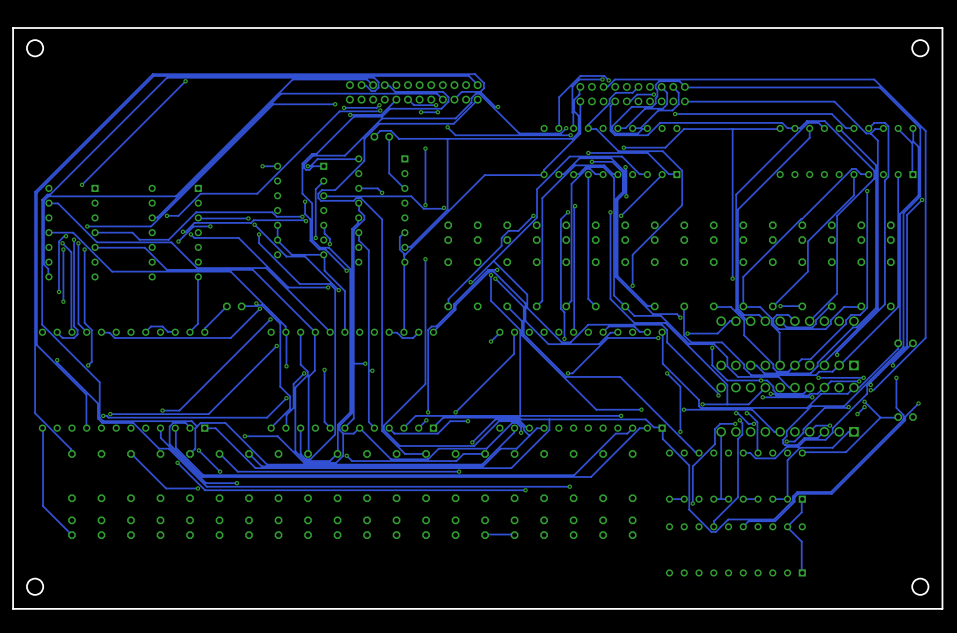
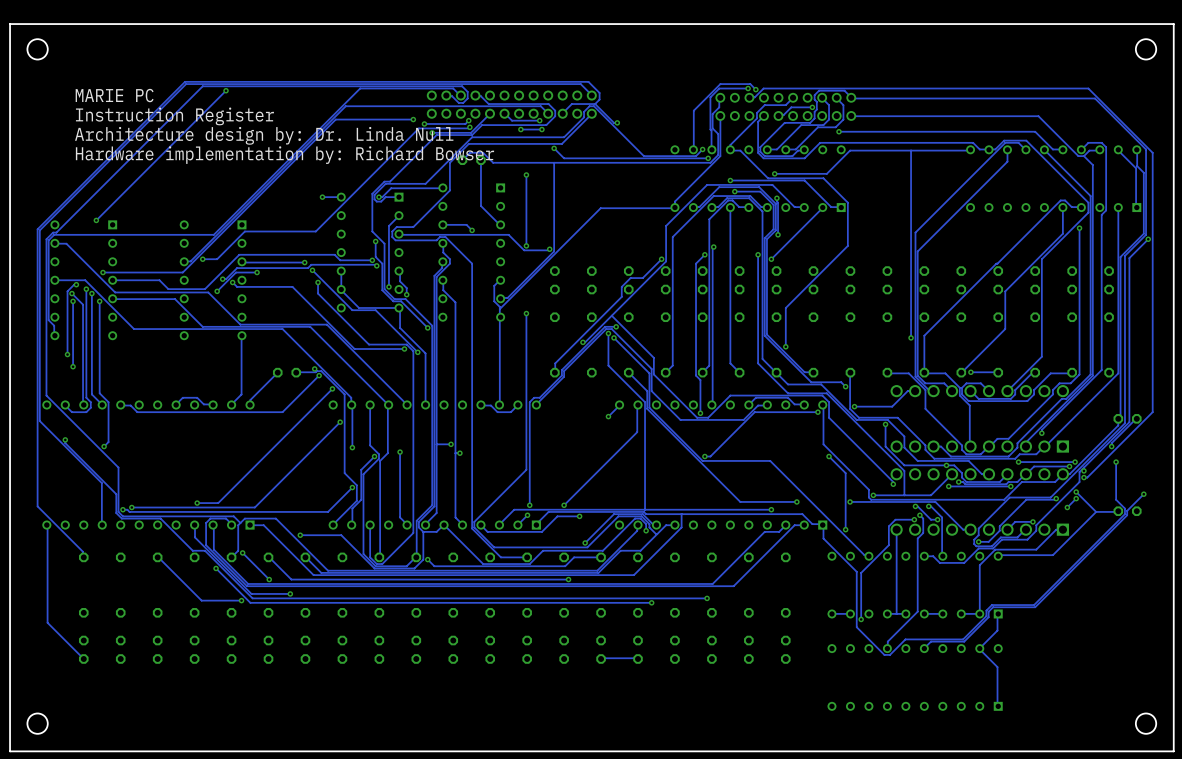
text: none -> MARIE PC (114, 95)
text: none -> Instruction Register (174, 116)
text: none -> Architecture design by: Dr. Linda Null (264, 135)
text: none -> Hardware implementation by: Richard Bowser (284, 155)

